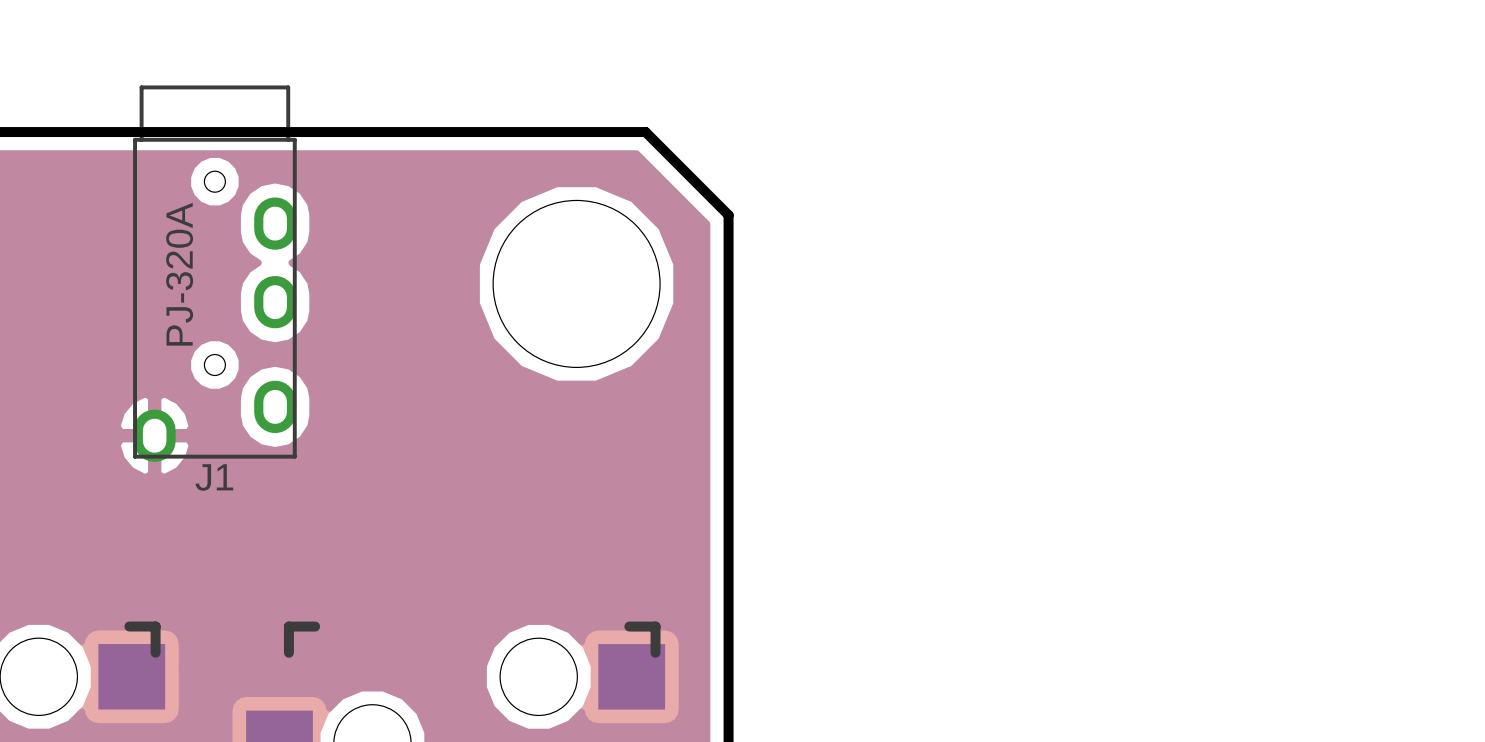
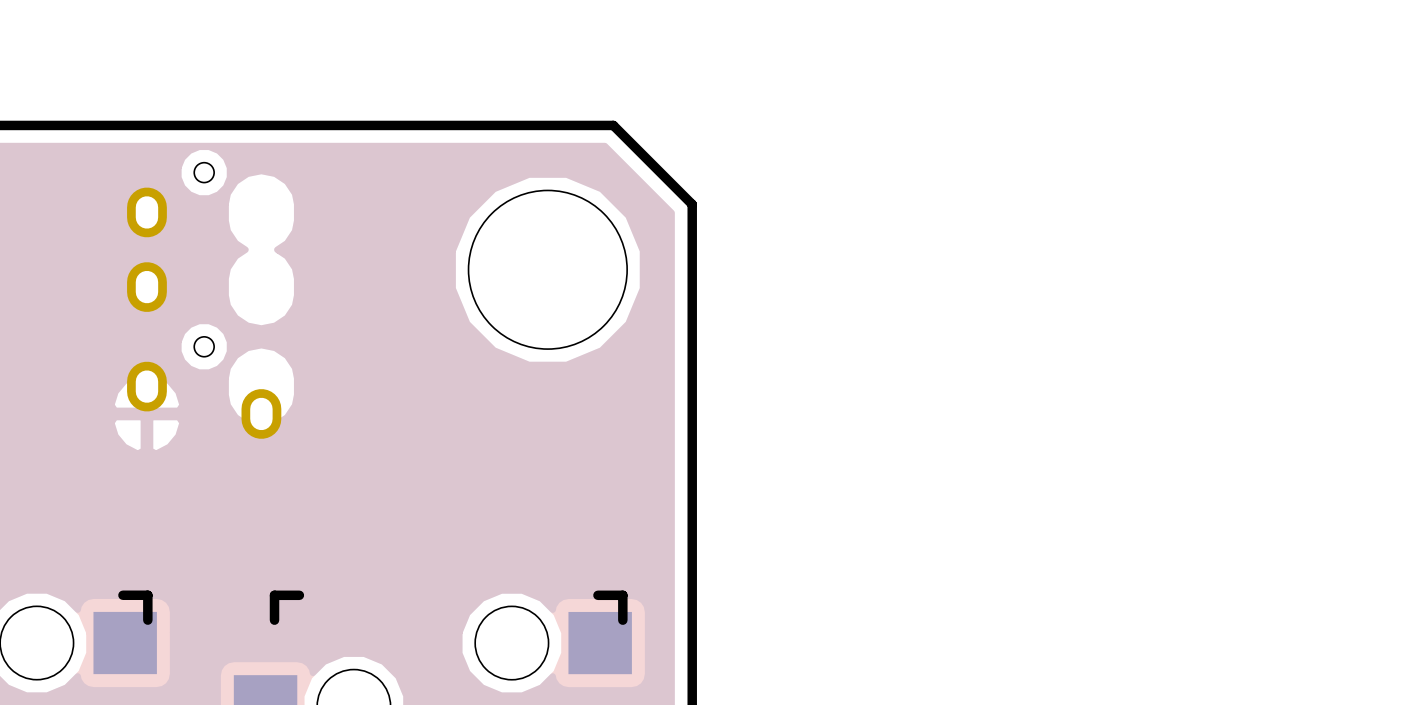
J1 side: top (214, 273) -> bottom (204, 300)

